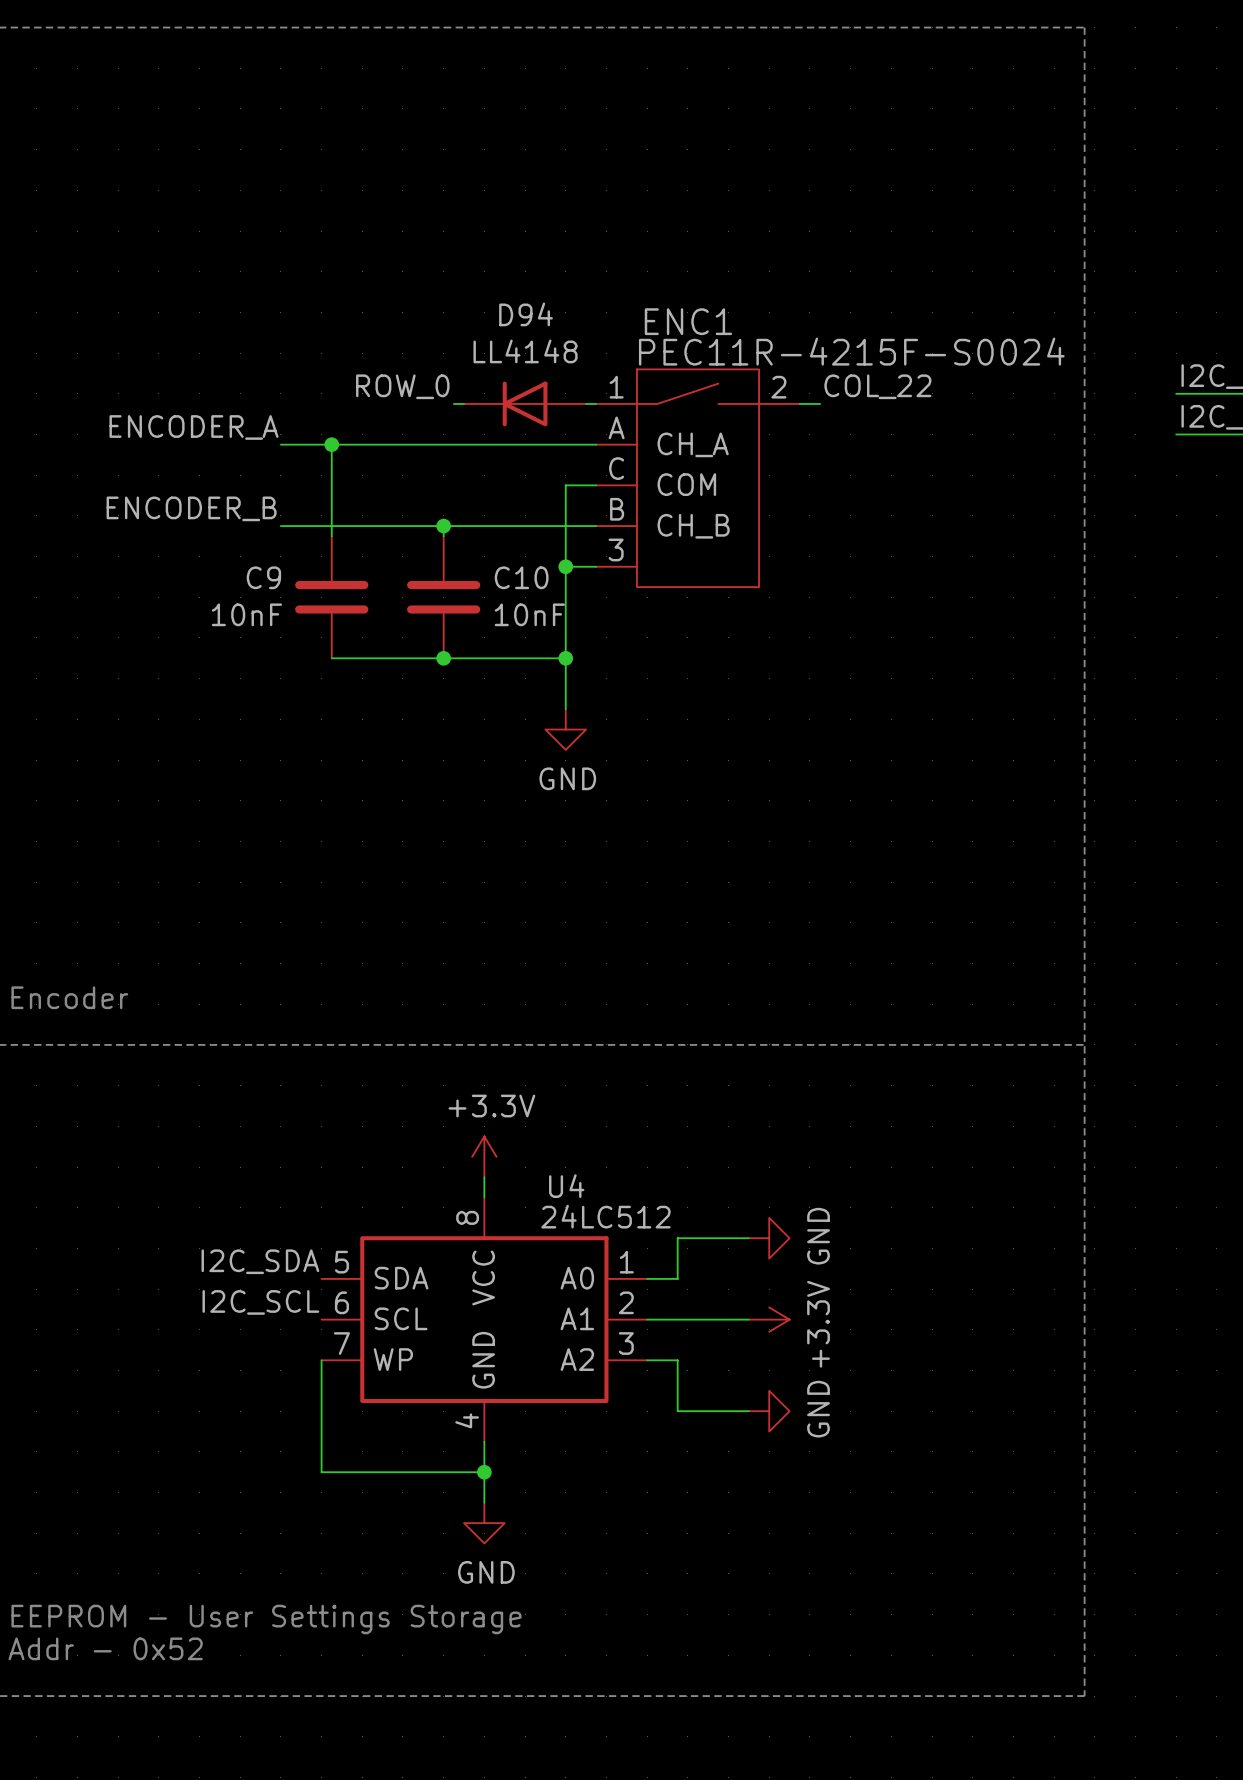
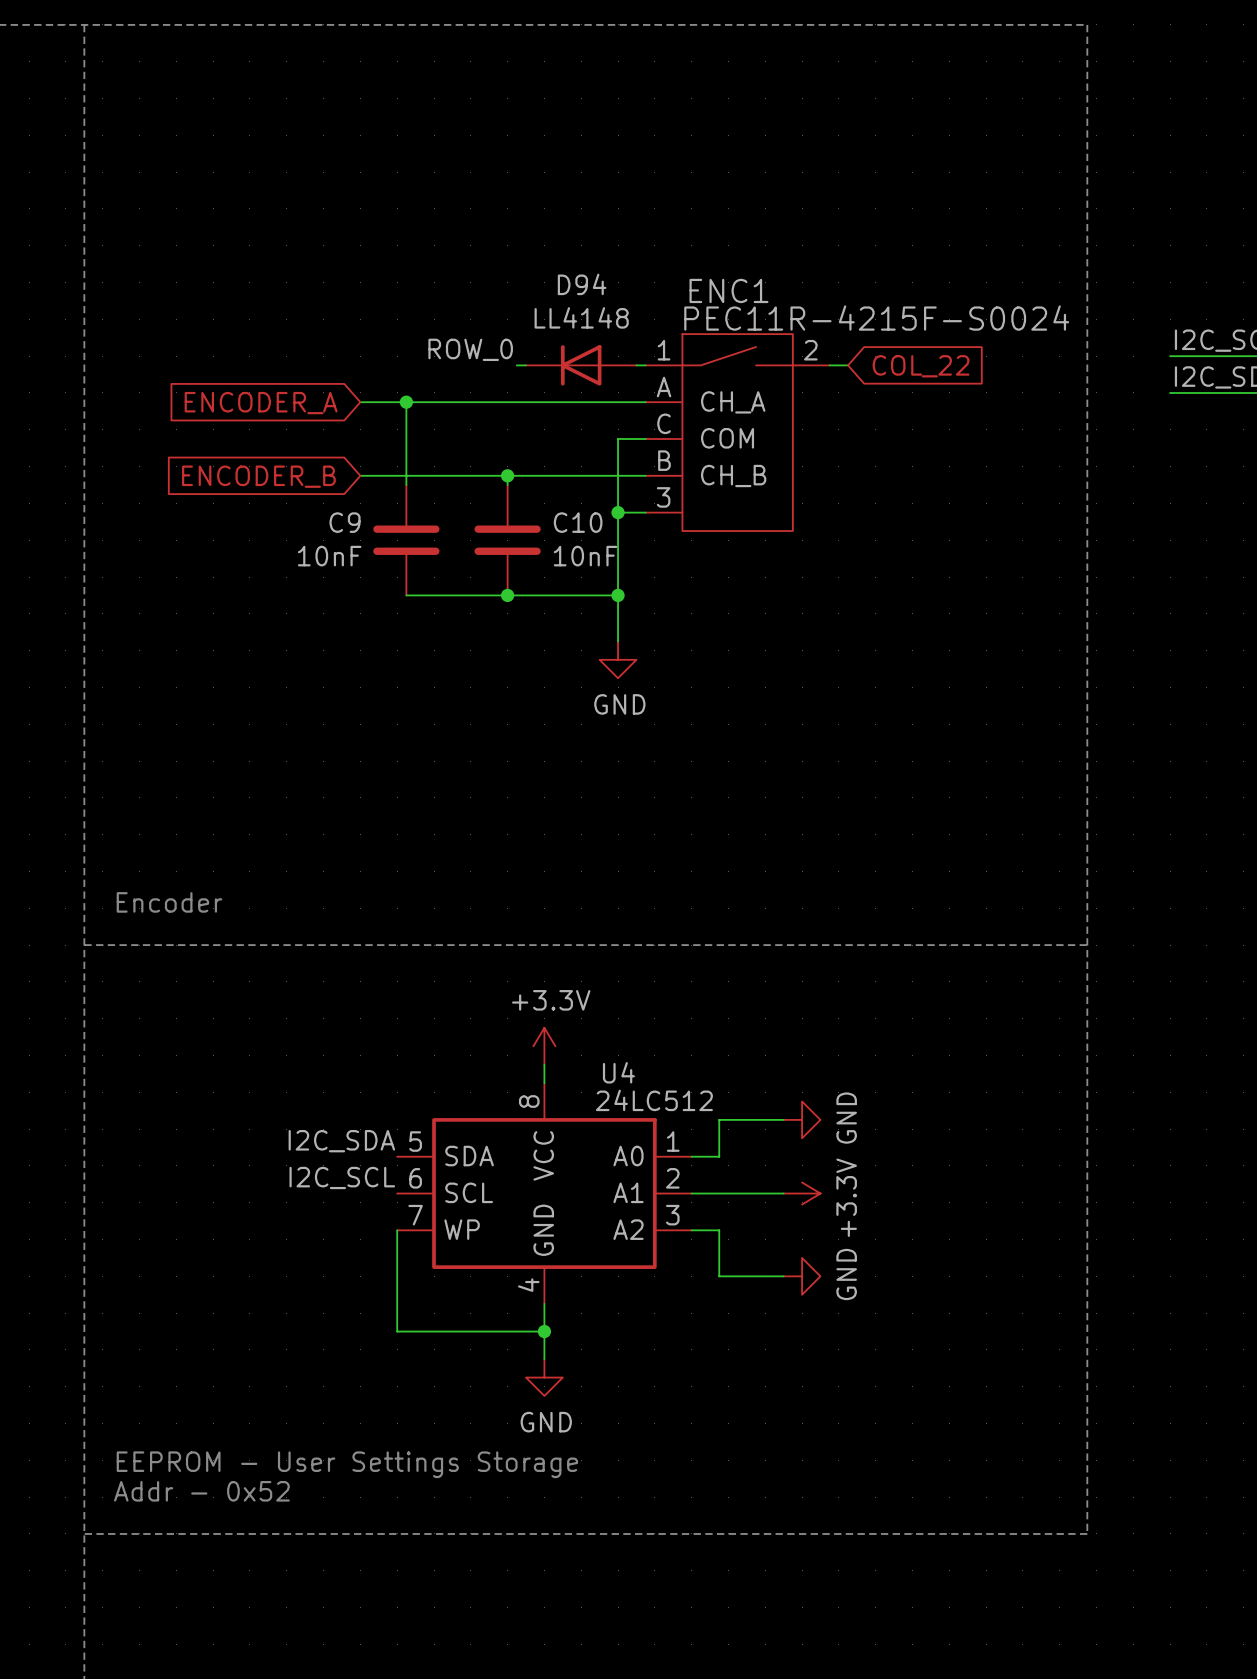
label: COL_22 (877, 386) -> none
global label: none -> COL_22 (921, 366)
label: ENCODER_A (194, 427) -> none
global label: none -> ENCODER_A (261, 403)
label: ENCODER_B (191, 508) -> none
global label: none -> ENCODER_B (258, 476)

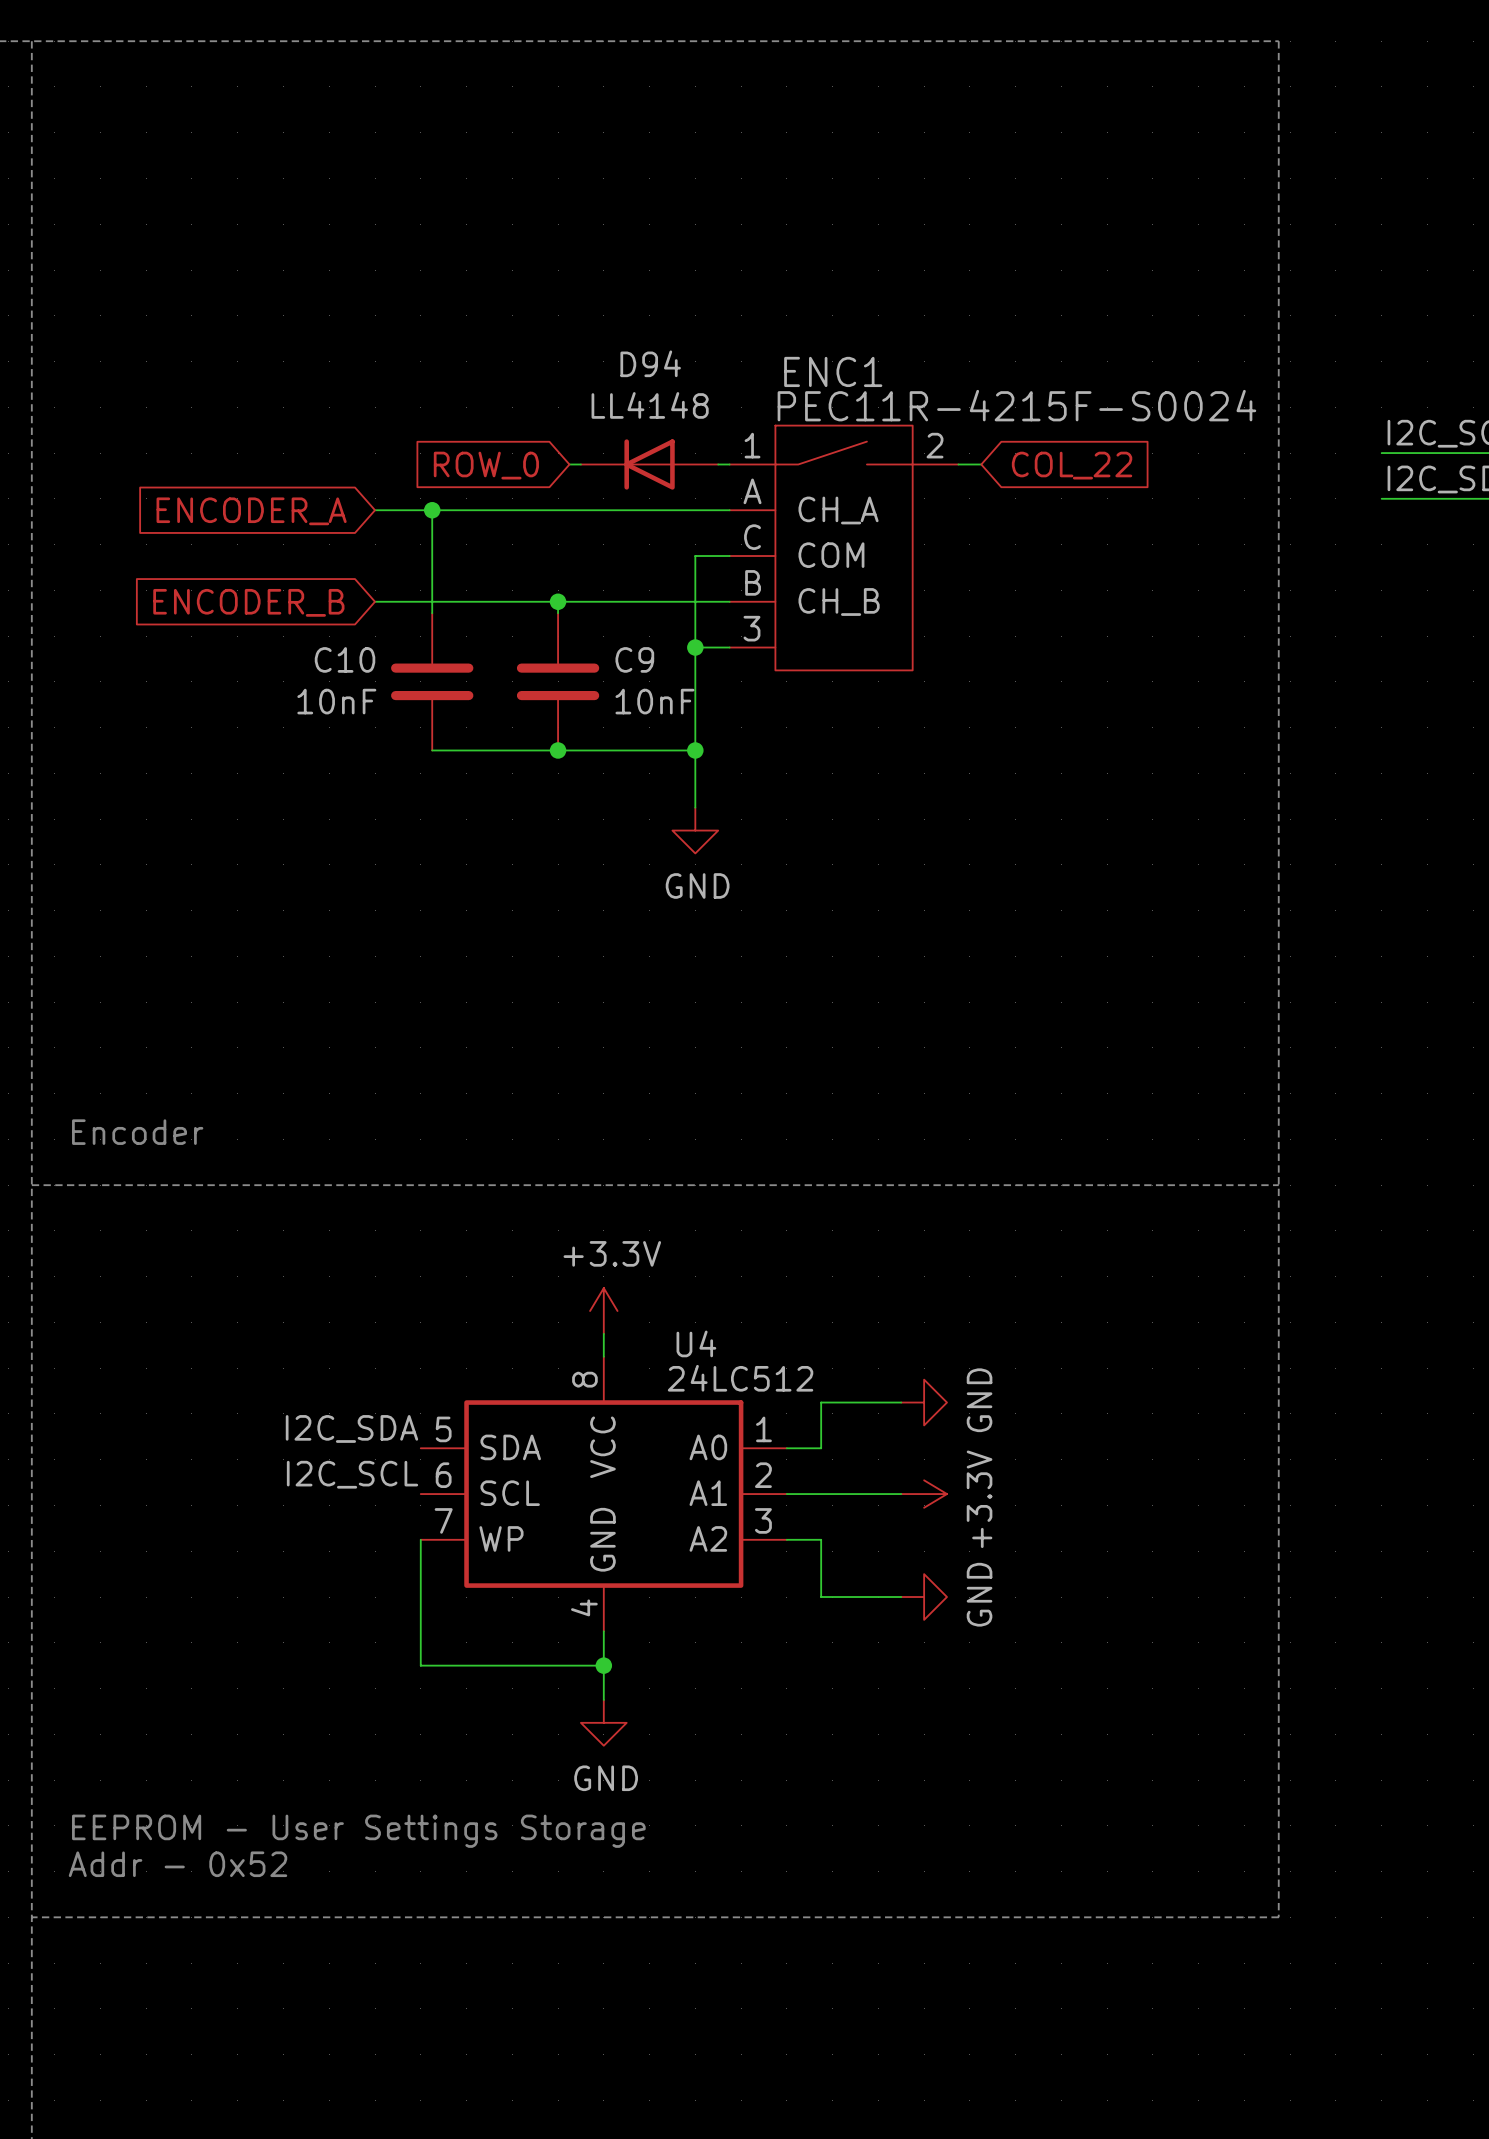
label: ROW_0 (470, 349) -> none
global label: none -> ROW_0 (486, 465)
C9 name: C9 (345, 522) -> C10 (345, 659)
C10 name: C10 (578, 522) -> C9 (634, 659)

